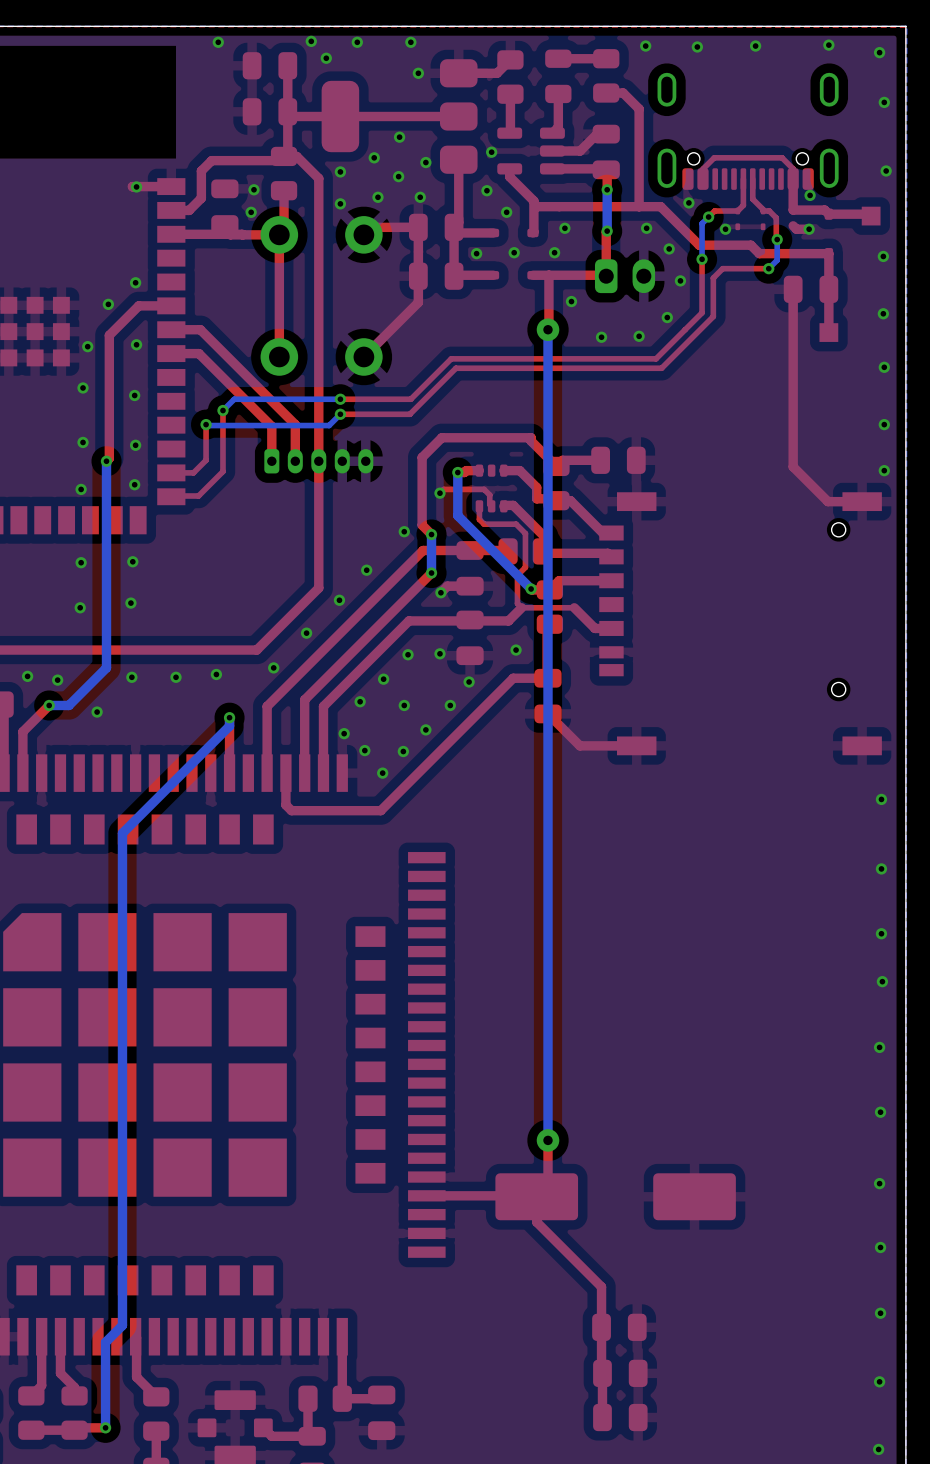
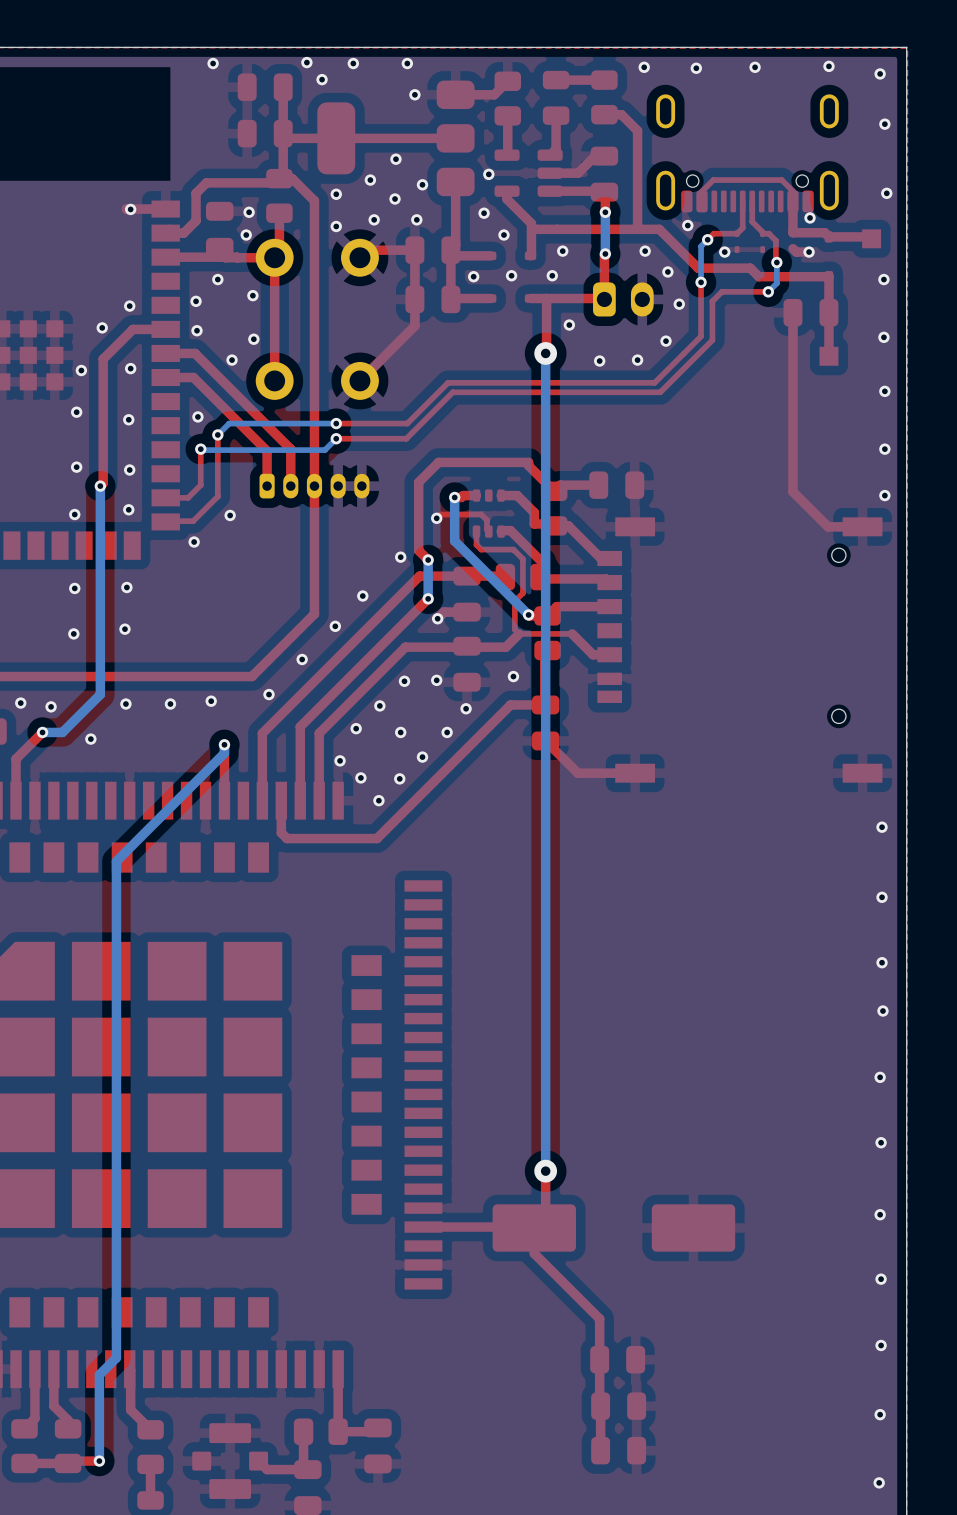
via: none -> (217, 279)
via: none -> (252, 295)
via: none -> (196, 301)
via: none -> (196, 330)
via: none -> (253, 339)
via: none -> (232, 360)
via: none -> (197, 416)
via: none -> (230, 515)
via: none -> (194, 542)

